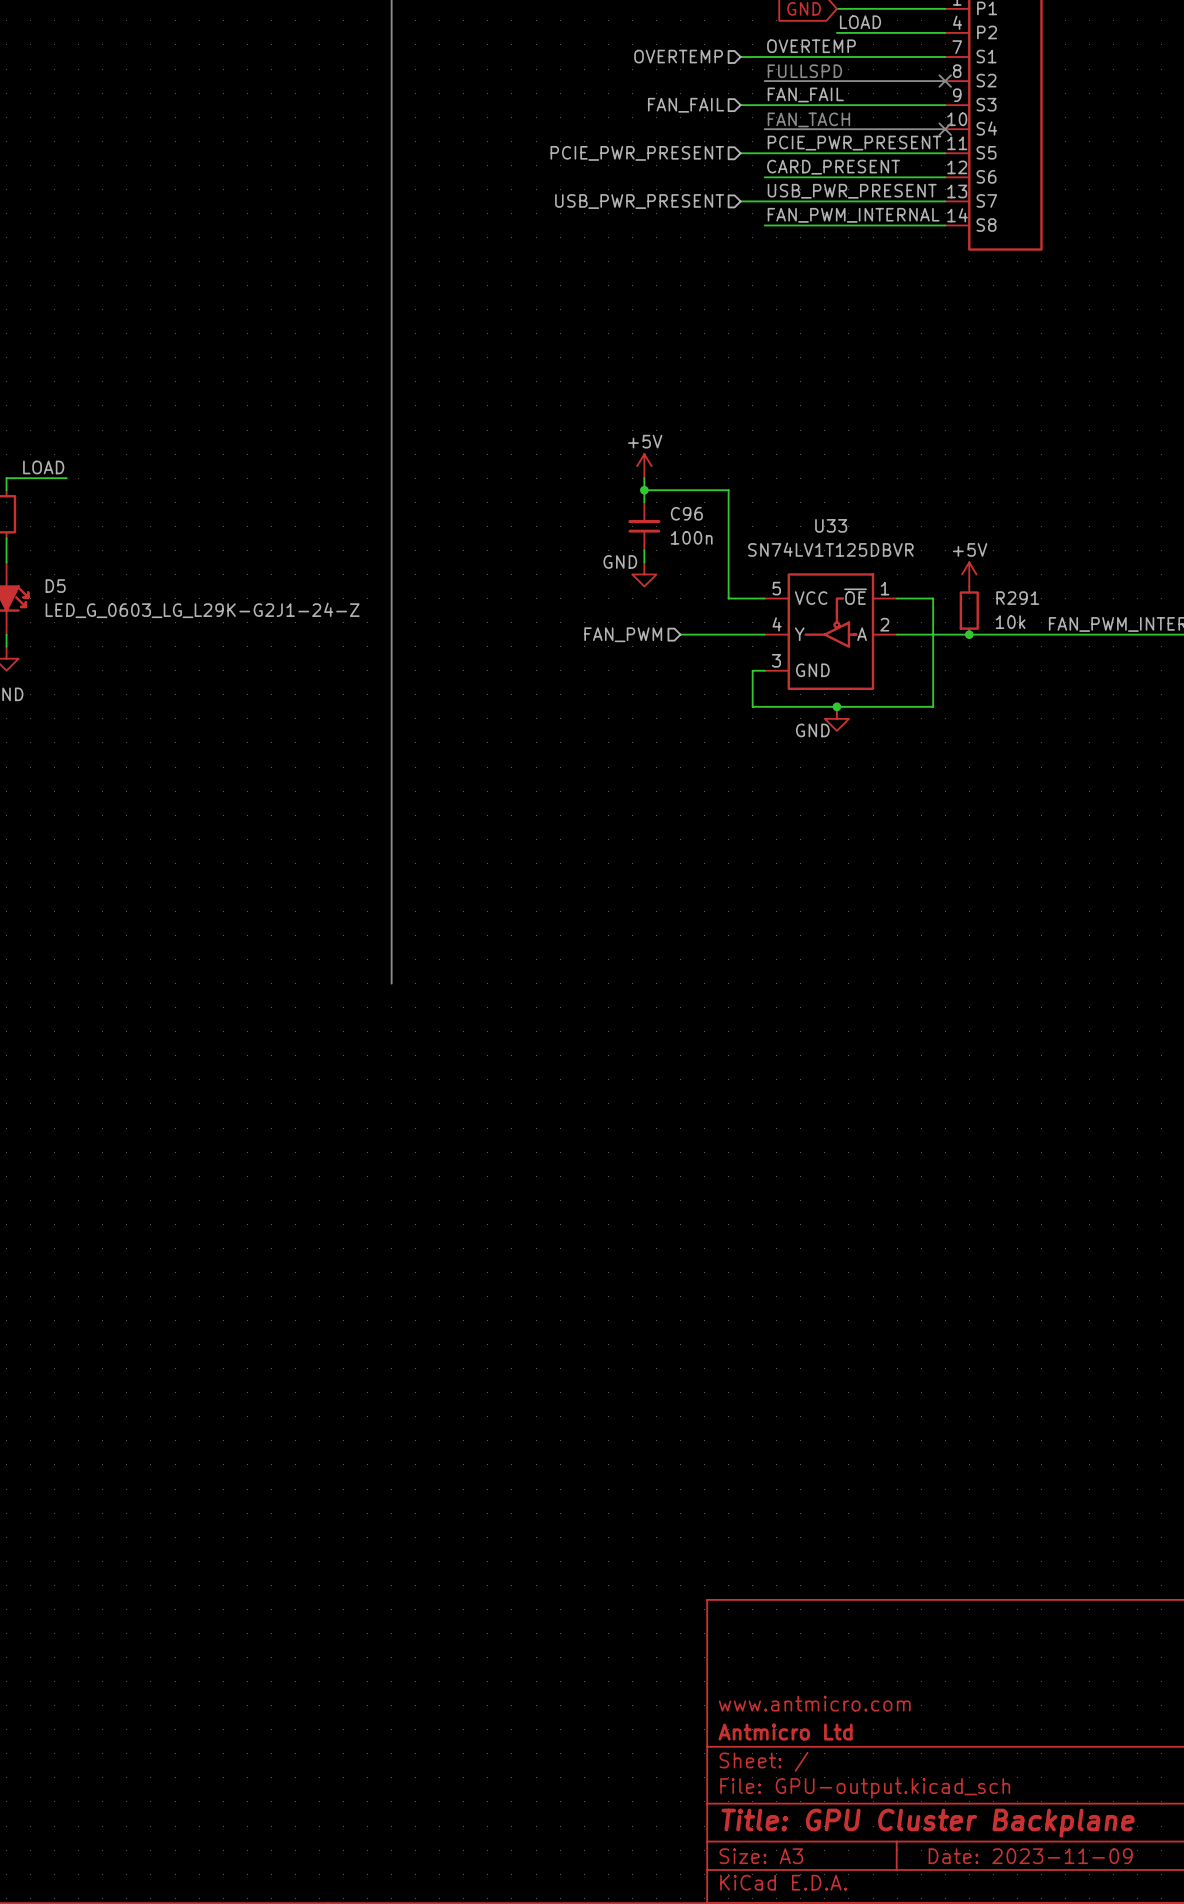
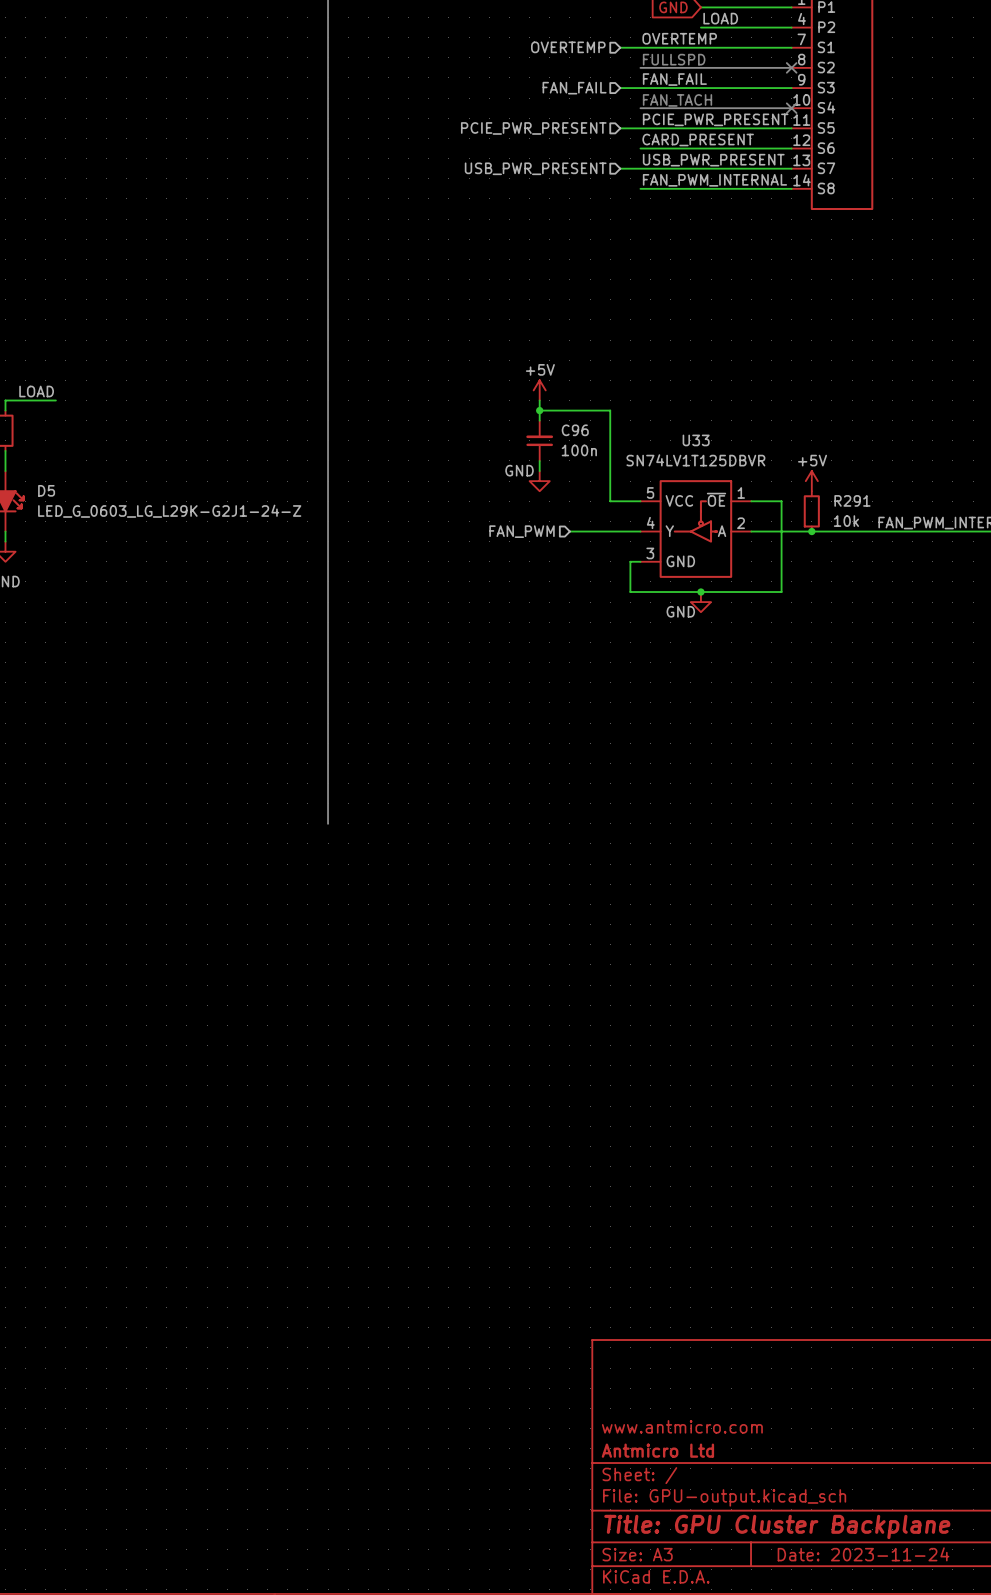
title block: Date: 2023-11-09 (1030, 1856) -> Date: 2023-11-24 (863, 1554)

